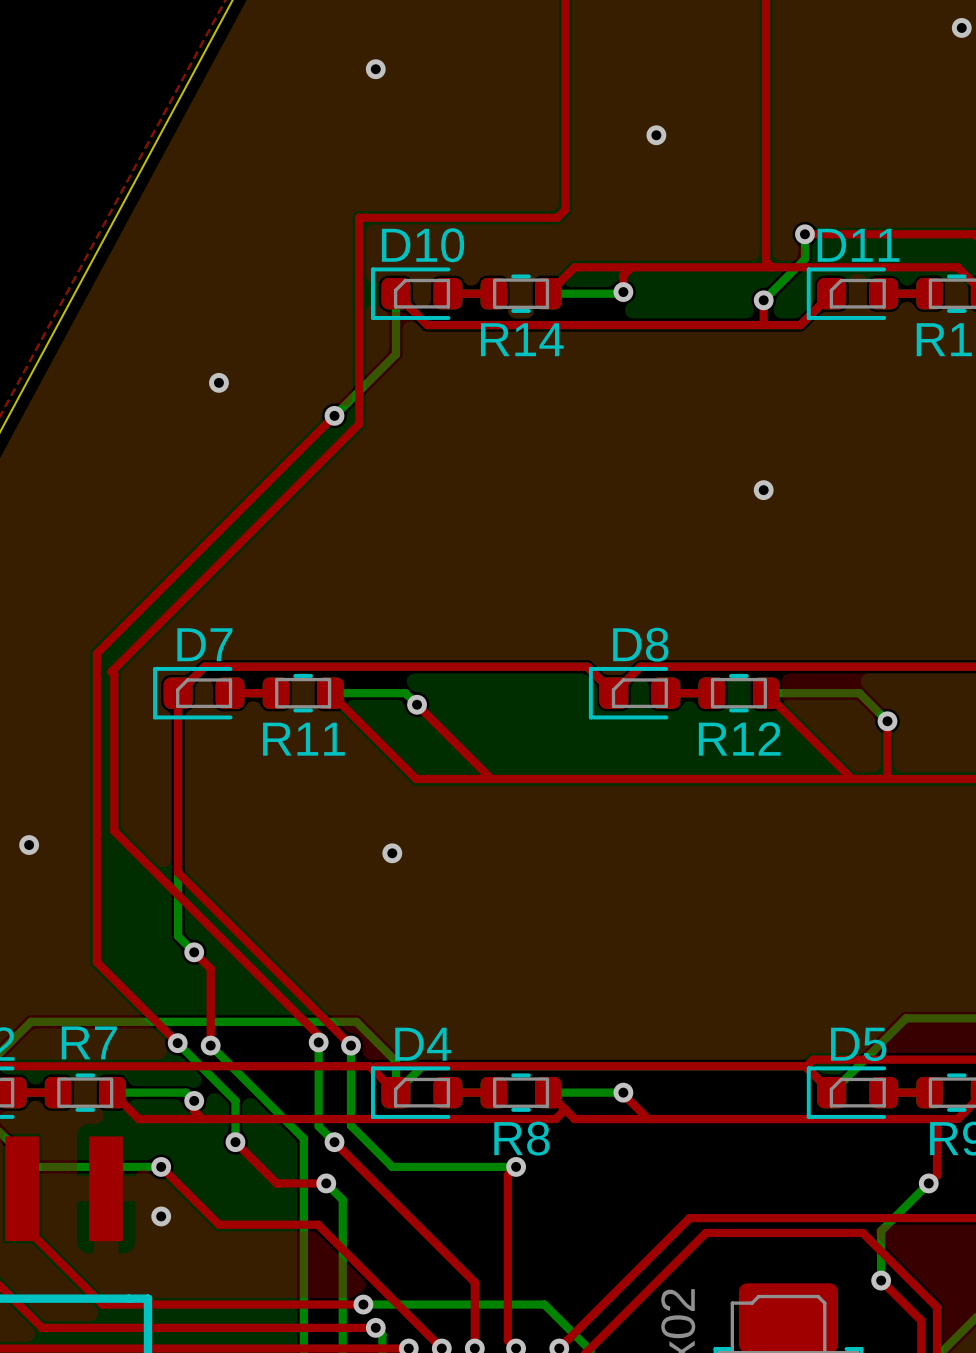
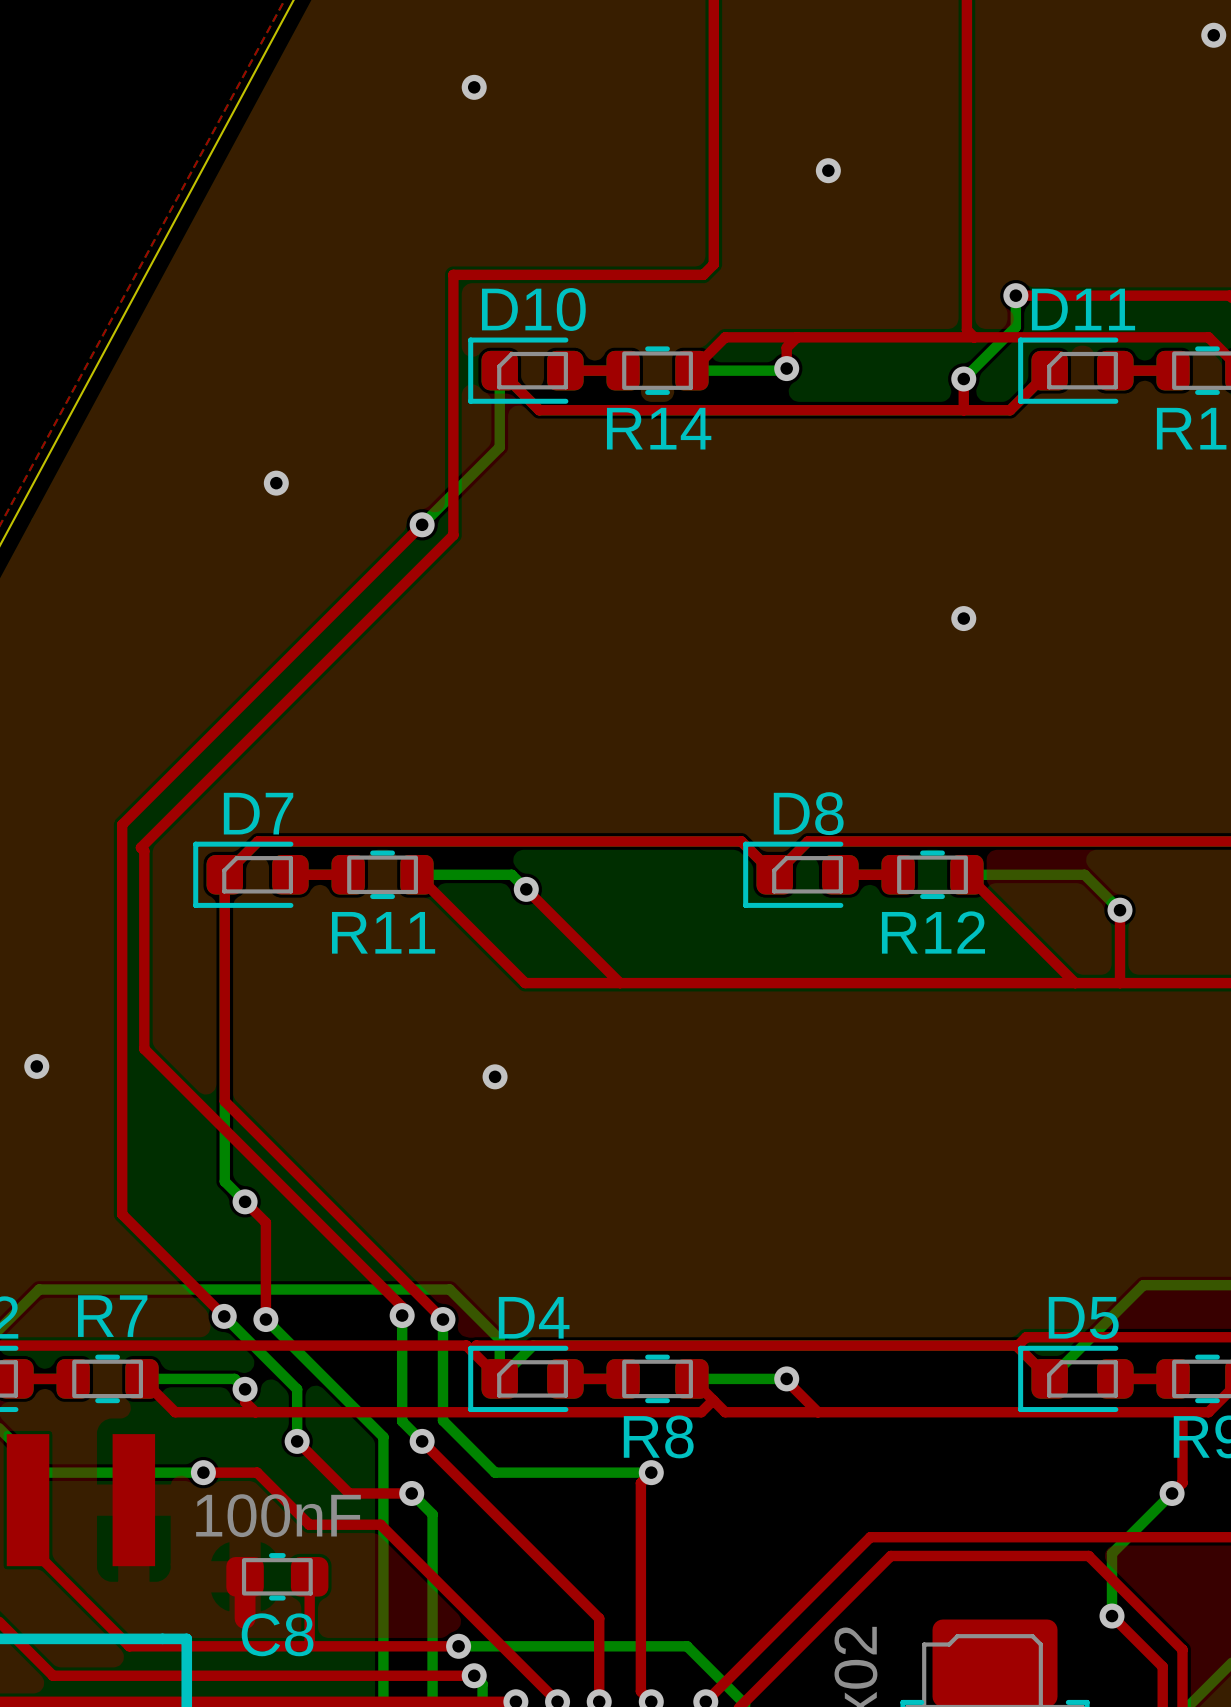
top track: (161, 1166) (218, 1224) (318, 1224) -> (203, 1472) (257, 1472) (309, 1524) (380, 1524) (401, 1545)
via: (161, 1216) -> none
top track: none -> (245, 1576) (245, 1618)
C8: none -> 100nF (277, 1576)
top track: none -> (309, 1576) (309, 1644) (307, 1646)

